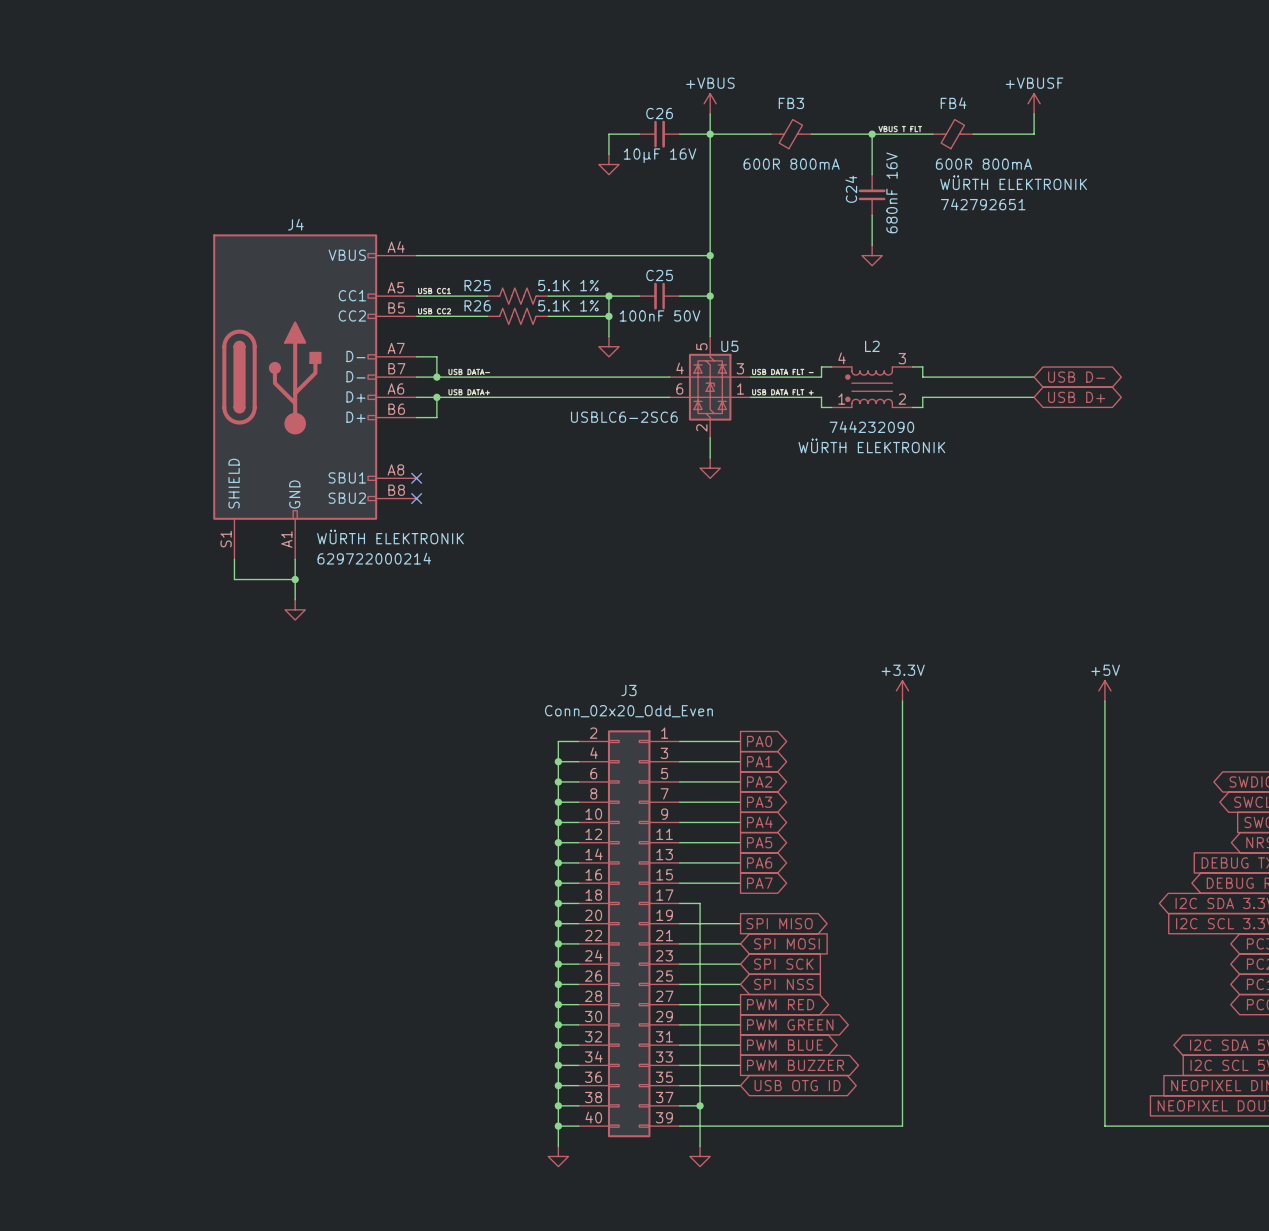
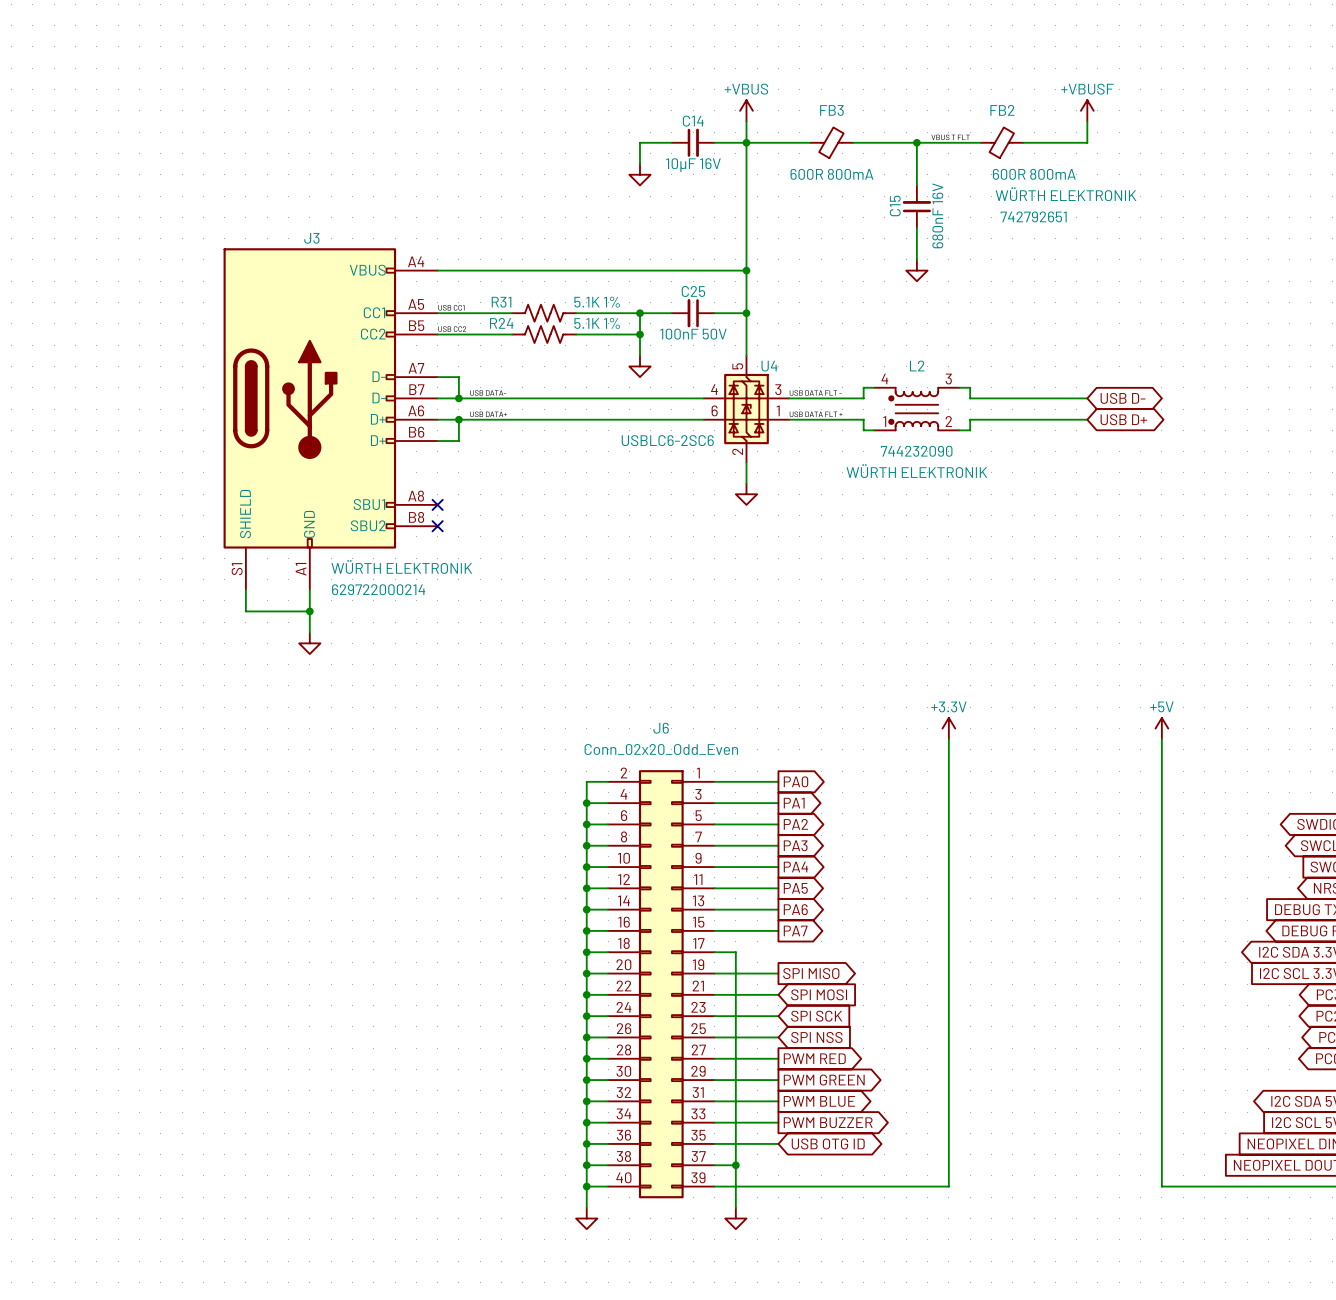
FB4 name: FB4 (953, 103) -> FB2 (1002, 110)
C26 name: C26 (659, 113) -> C14 (693, 121)
C24 name: C24 (851, 189) -> C15 (895, 205)
J4 name: J4 (295, 224) -> J3 (311, 238)
R25 name: R25 (477, 285) -> R31 (501, 302)
R26 name: R26 (477, 305) -> R24 (501, 323)
U5 name: U5 (729, 346) -> U4 (769, 366)
J3 name: J3 (628, 690) -> J6 (661, 728)

